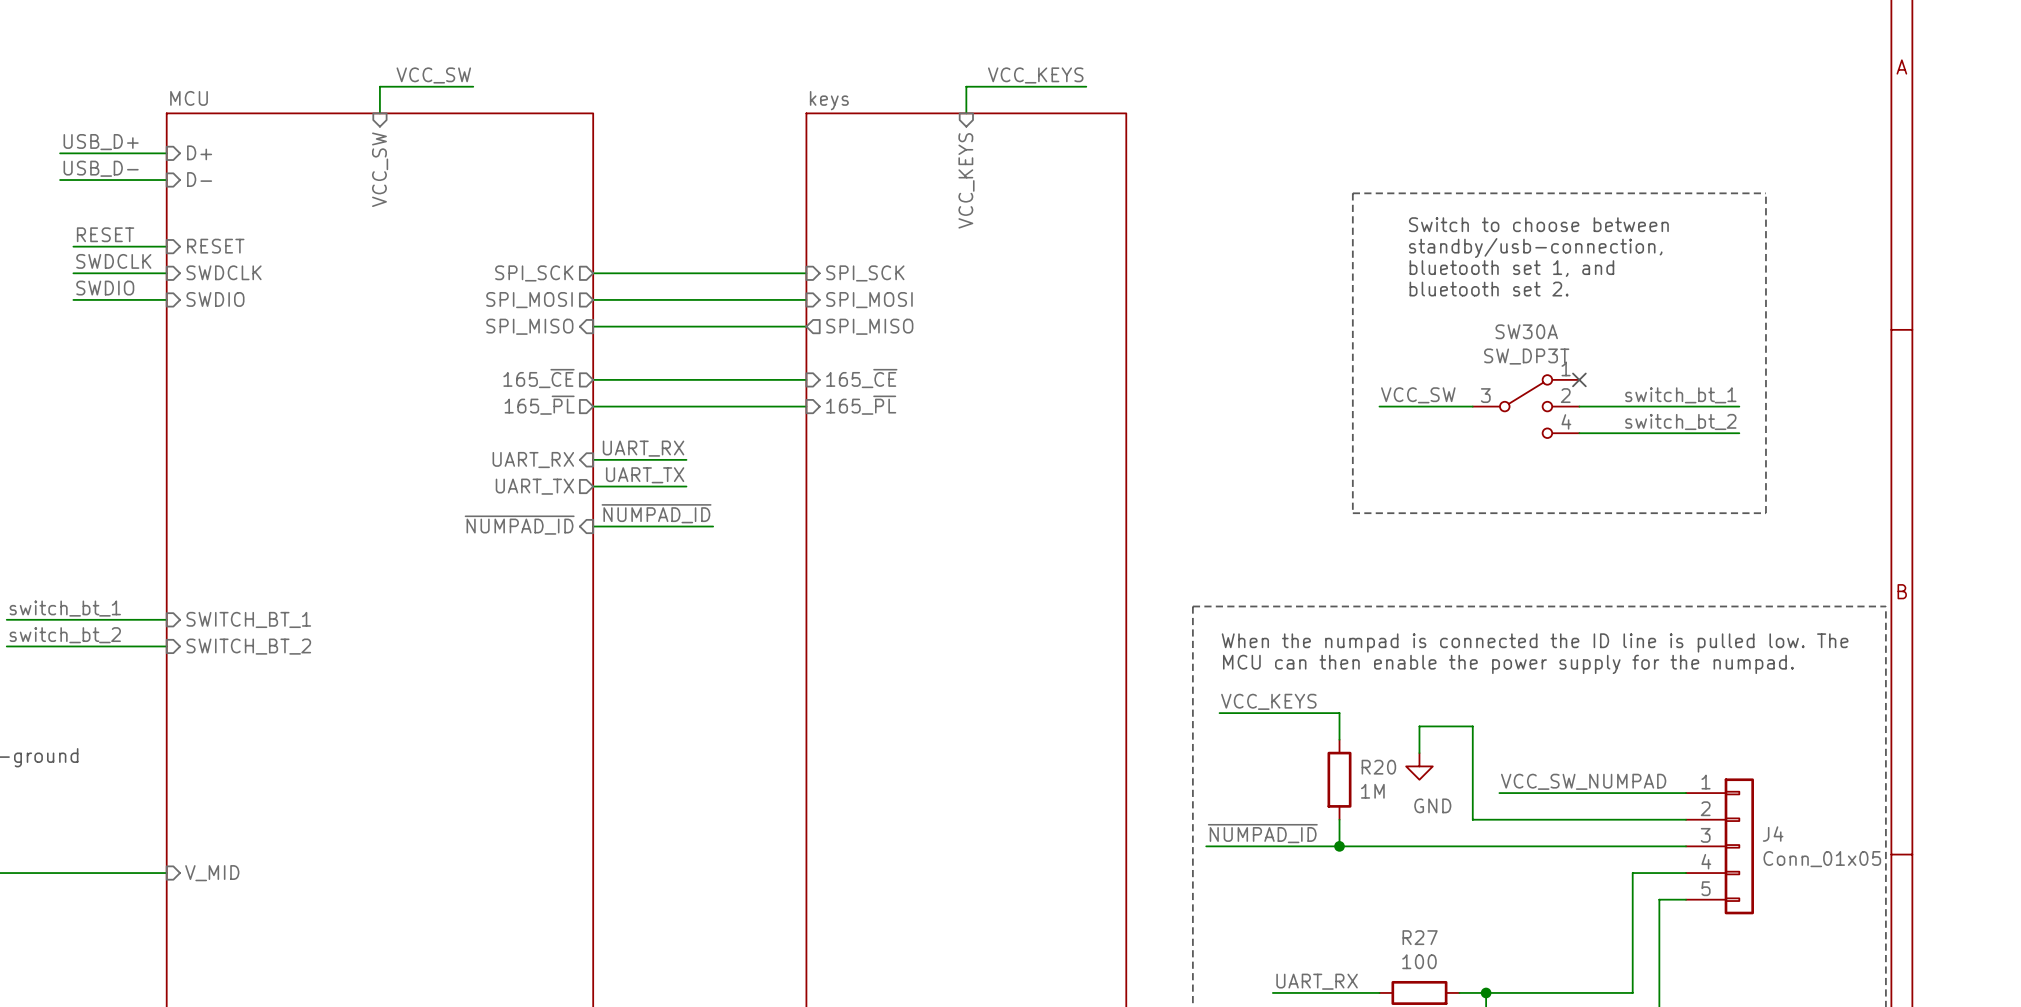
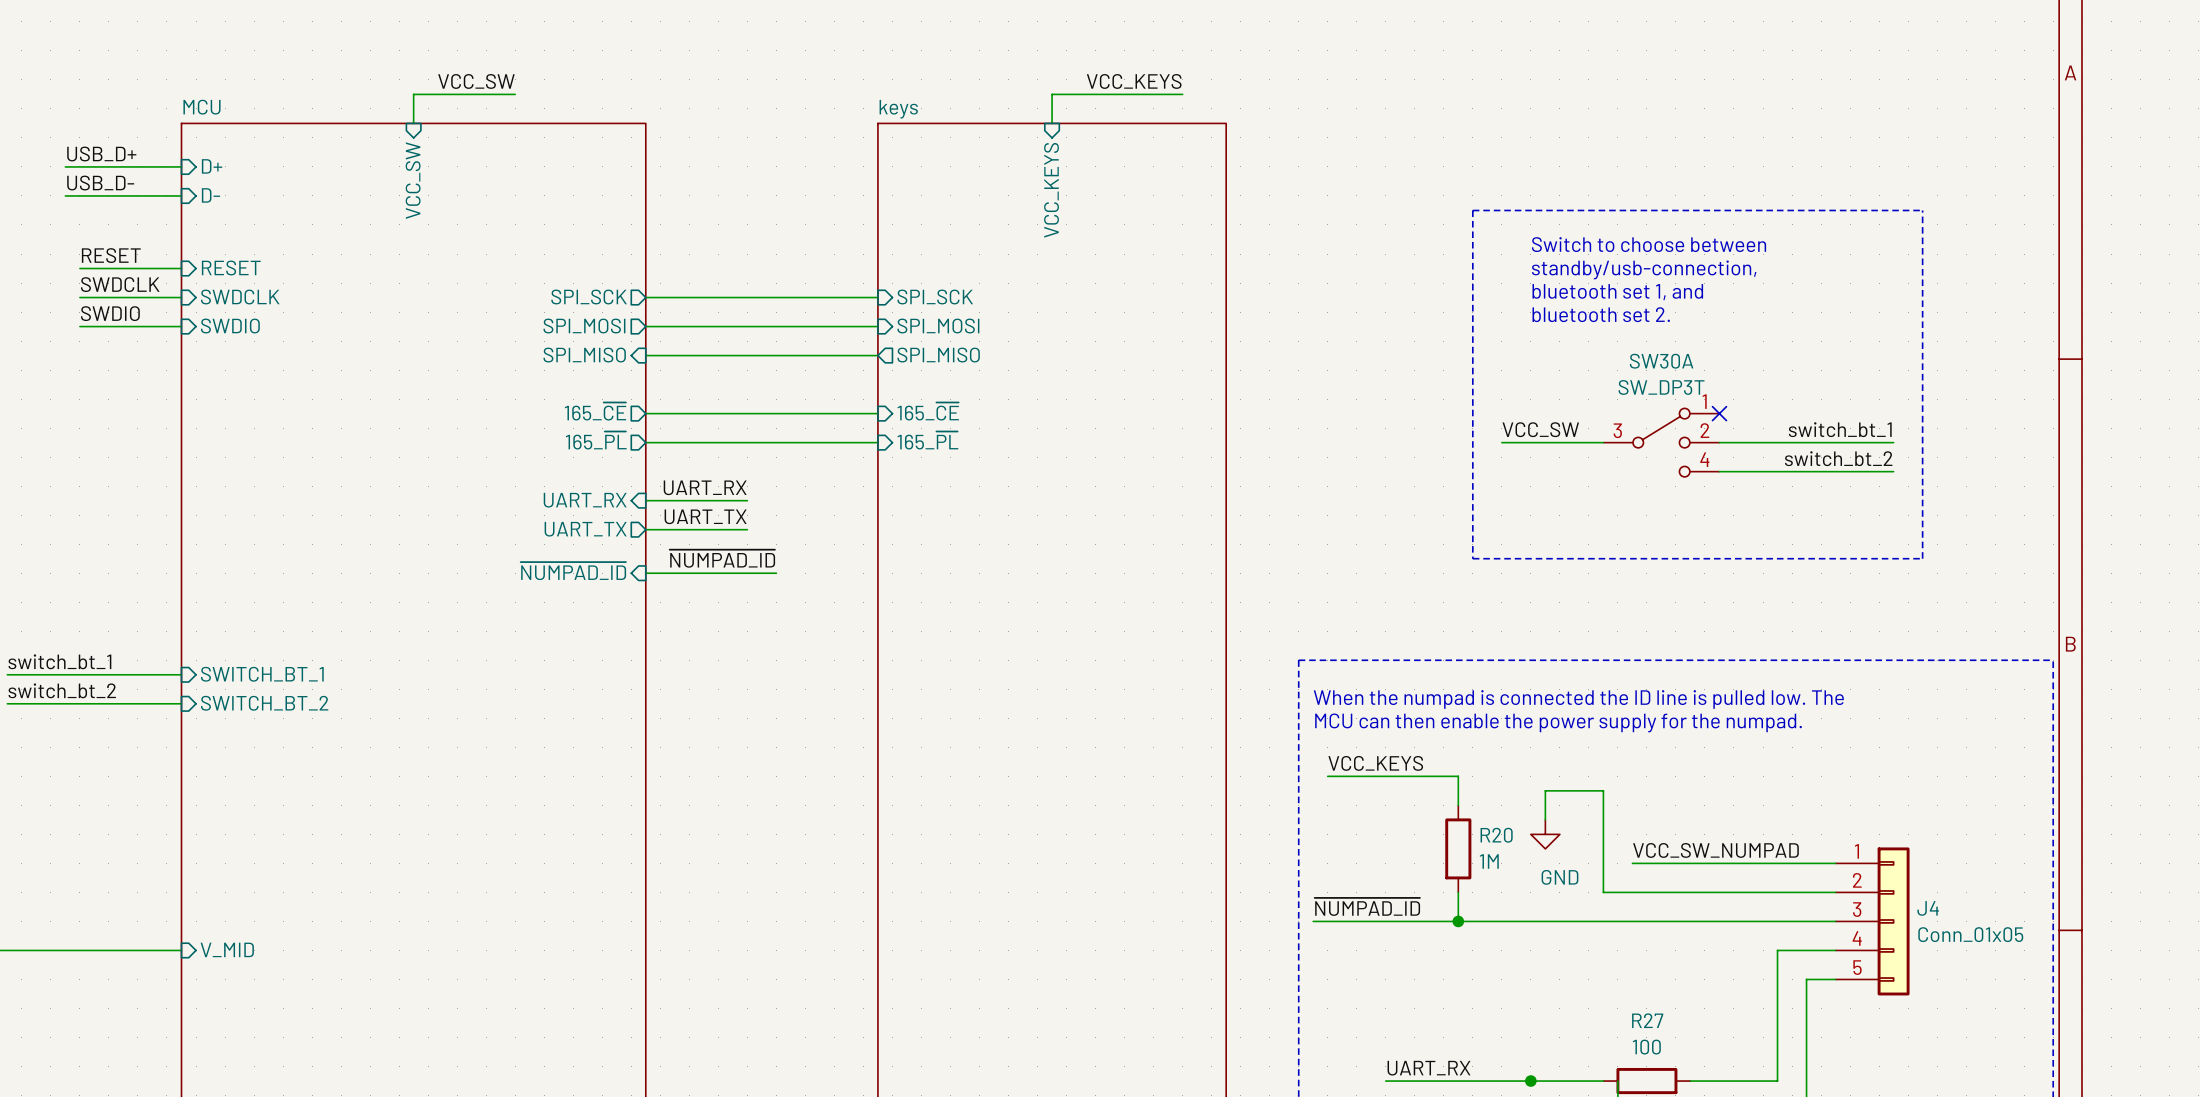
text position: When the numpad is connected the ID line is pulled low. The (1535, 642) -> When the numpad is connected the ID line is pulled low. The (1578, 699)
text position: MCU can then enable the power supply for the numpad. (1508, 664) -> MCU can then enable the power supply for the numpad. (1558, 722)
junction: none -> (1530, 1081)
R27 position: (1419, 992) -> (1646, 1081)
wire: (1472, 992) (1552, 992) -> (1501, 1081) (1588, 1081)
junction: (1486, 992) -> none

